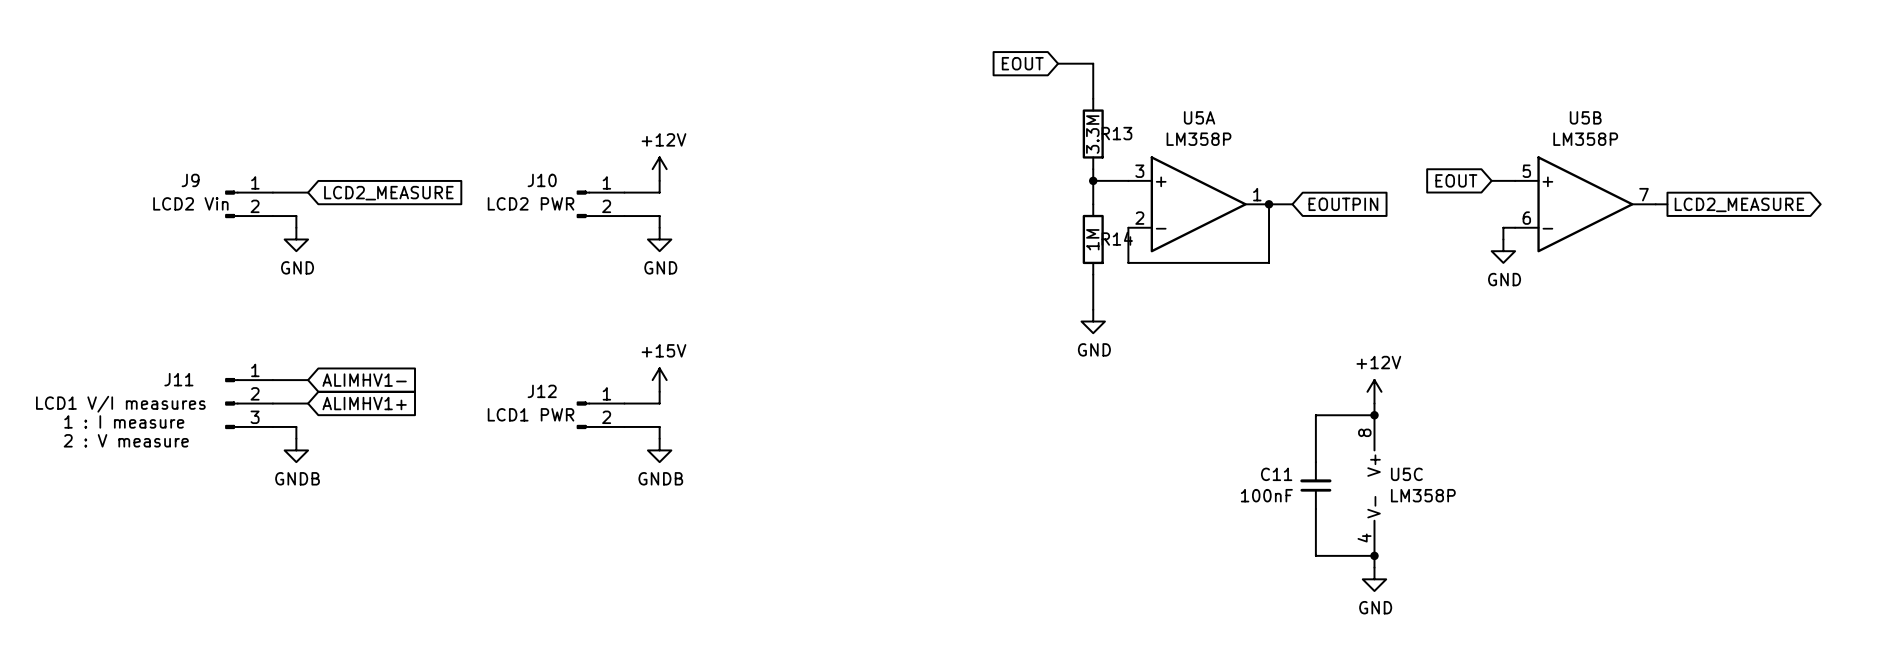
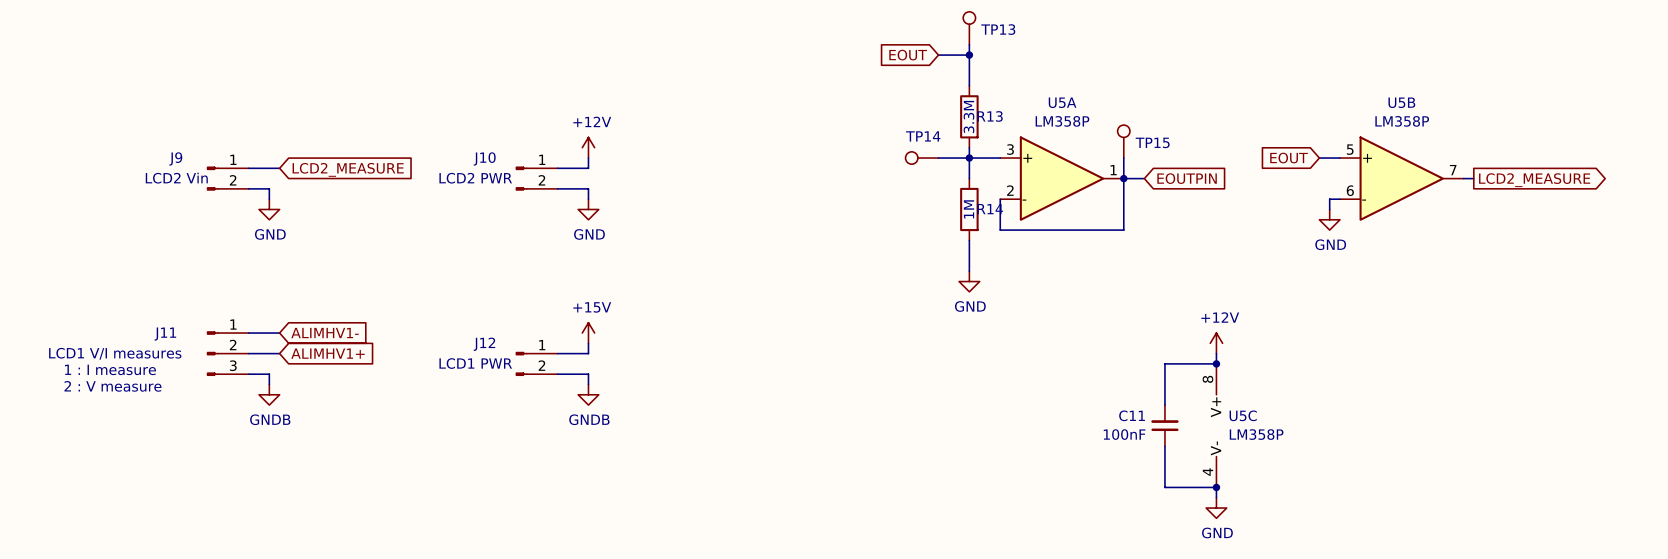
TP13: none -> (969, 28)
wire: none -> (969, 44) (969, 55)
junction: none -> (969, 55)
TP15: none -> (1123, 141)
TP14: none -> (922, 158)
wire: none -> (938, 158) (969, 158)
wire: none -> (1123, 158) (1123, 178)

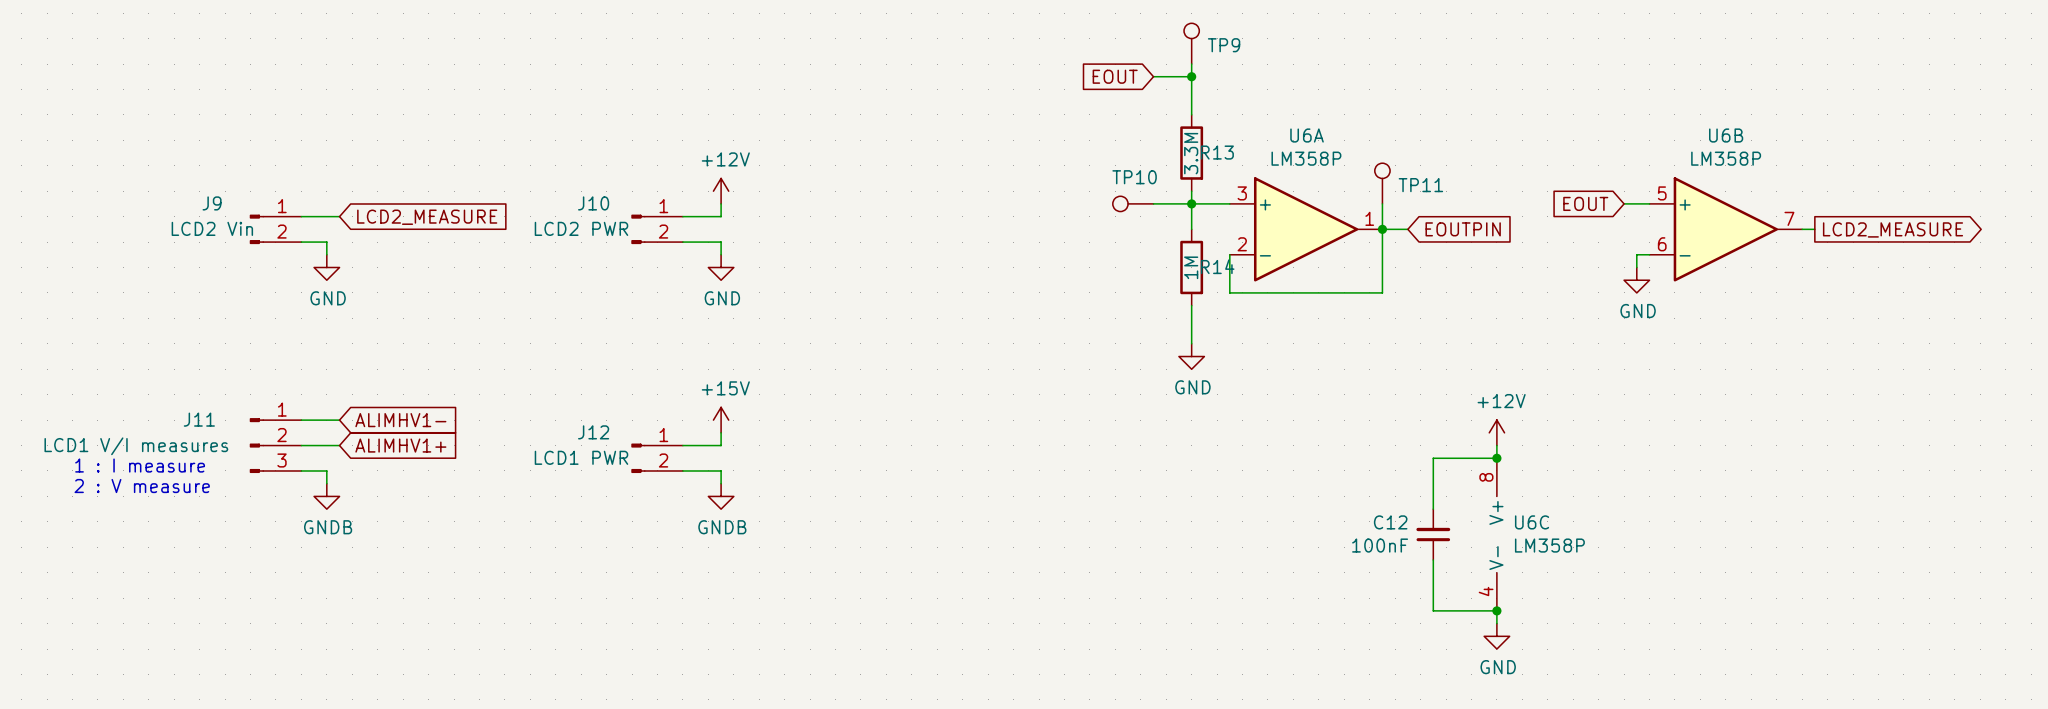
TP13 name: TP13 (998, 29) -> TP9 (1224, 45)
U5A name: U5A (1062, 102) -> U6A (1307, 135)
U5B name: U5B (1401, 102) -> U6B (1726, 135)
TP14 name: TP14 (923, 136) -> TP10 (1134, 177)
TP15 name: TP15 (1152, 142) -> TP11 (1420, 185)
C11 name: C11 (1132, 415) -> C12 (1390, 522)
U5C name: U5C (1243, 415) -> U6C (1532, 522)

